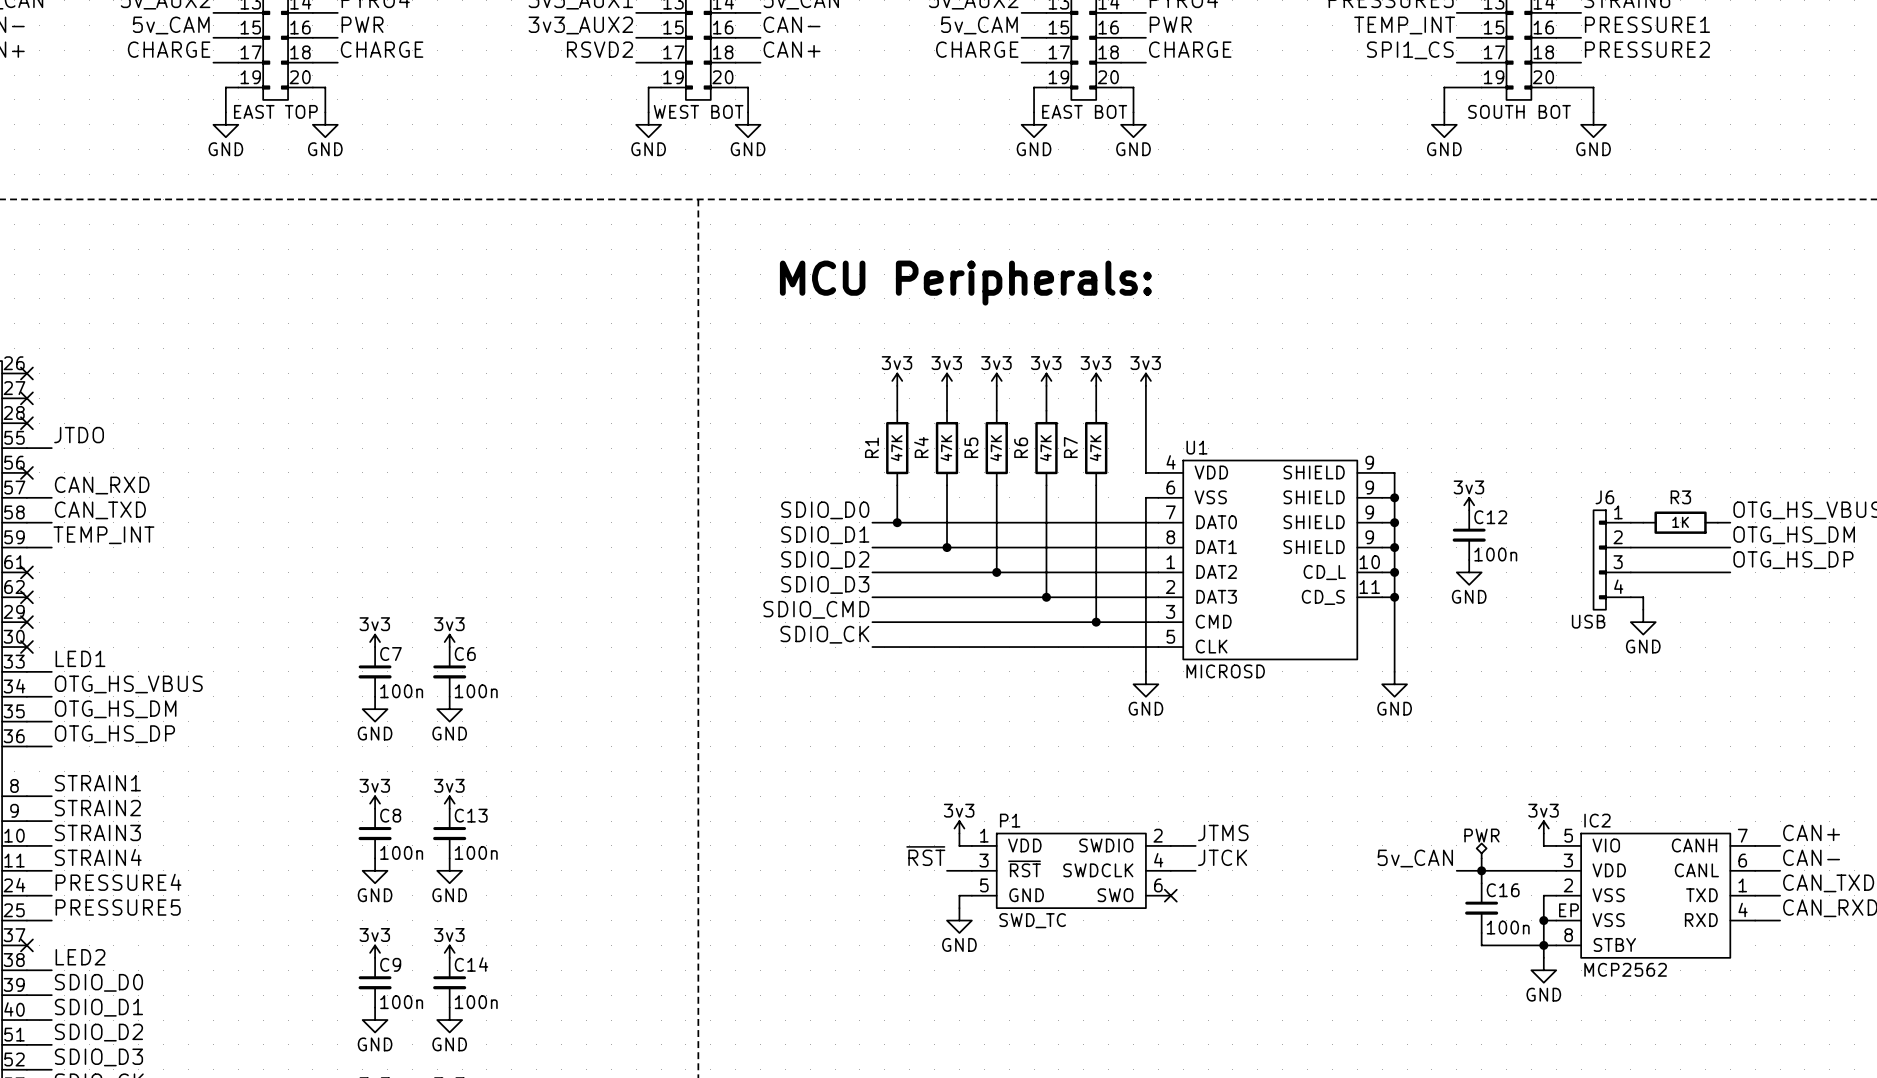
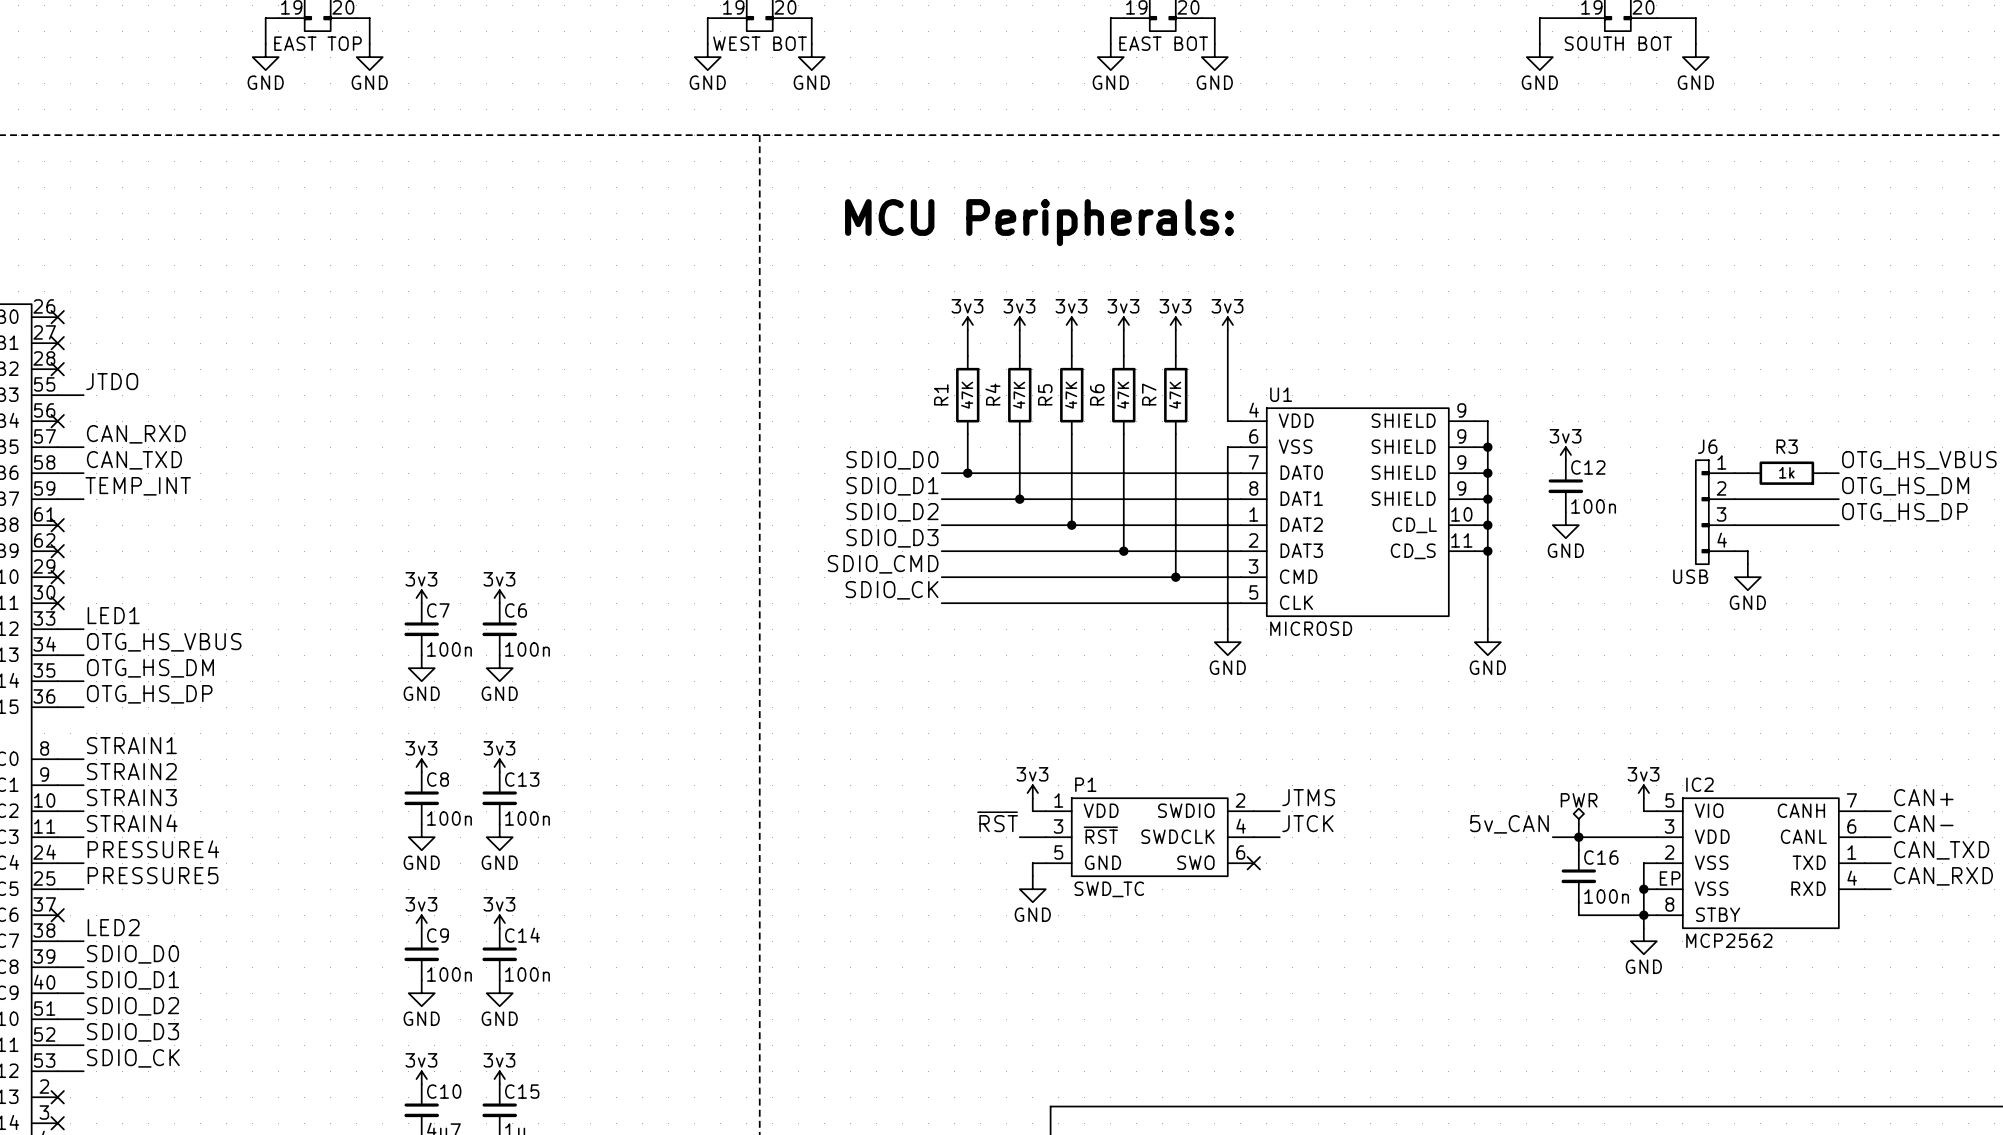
R3 value: 1K (1680, 522) -> 1k (1786, 472)

